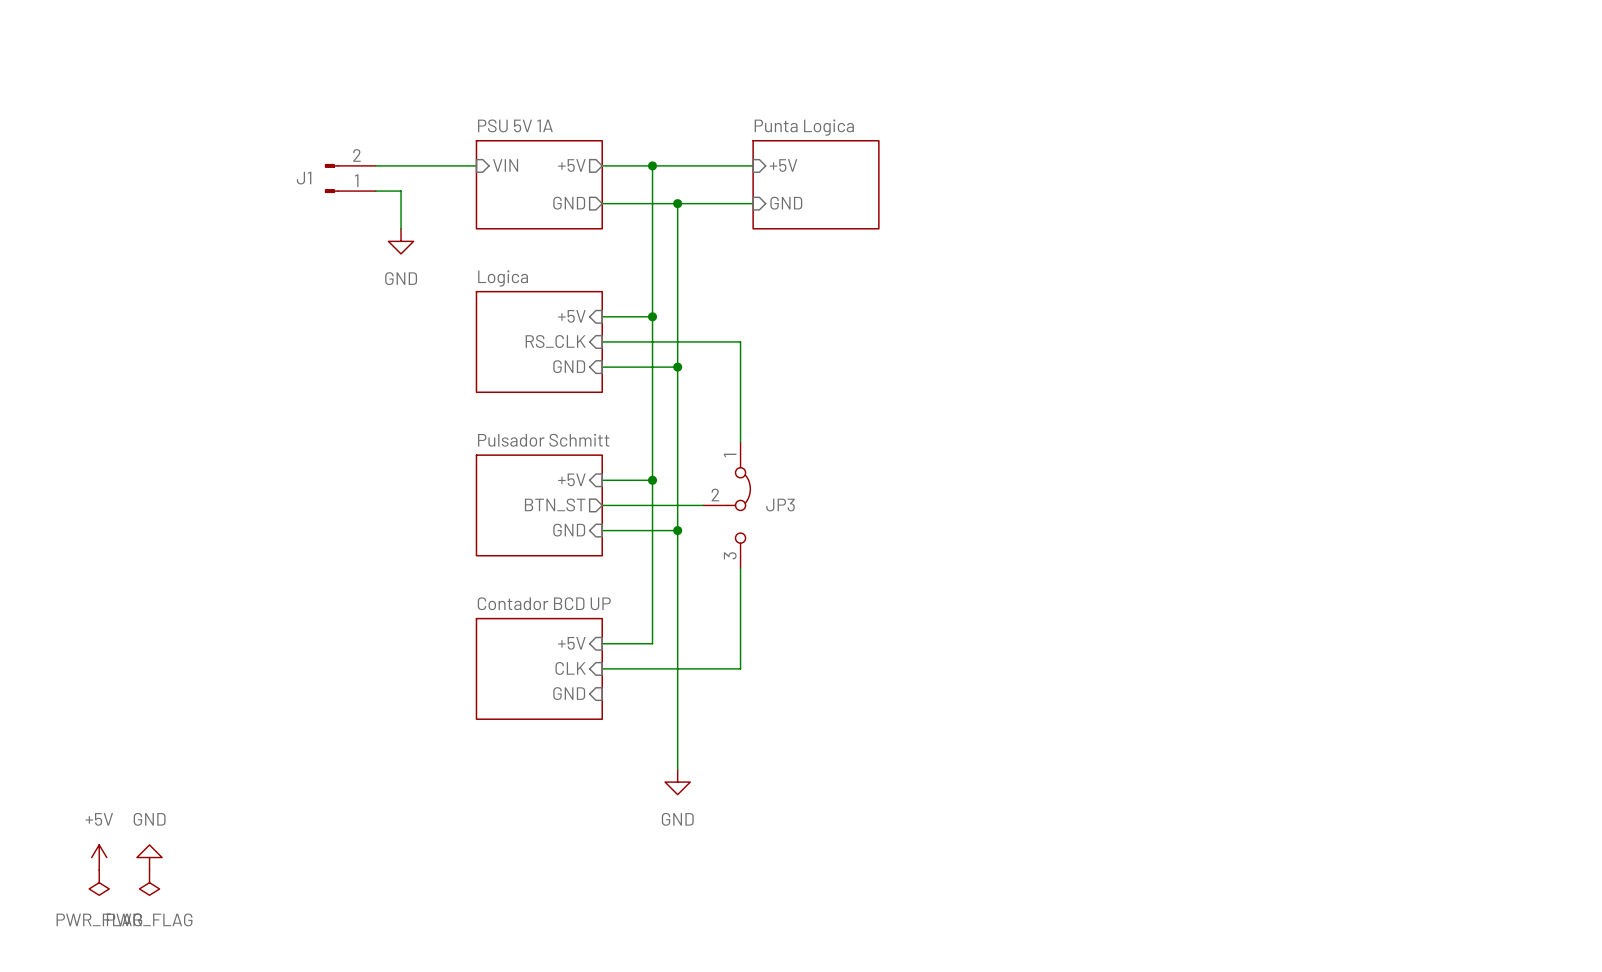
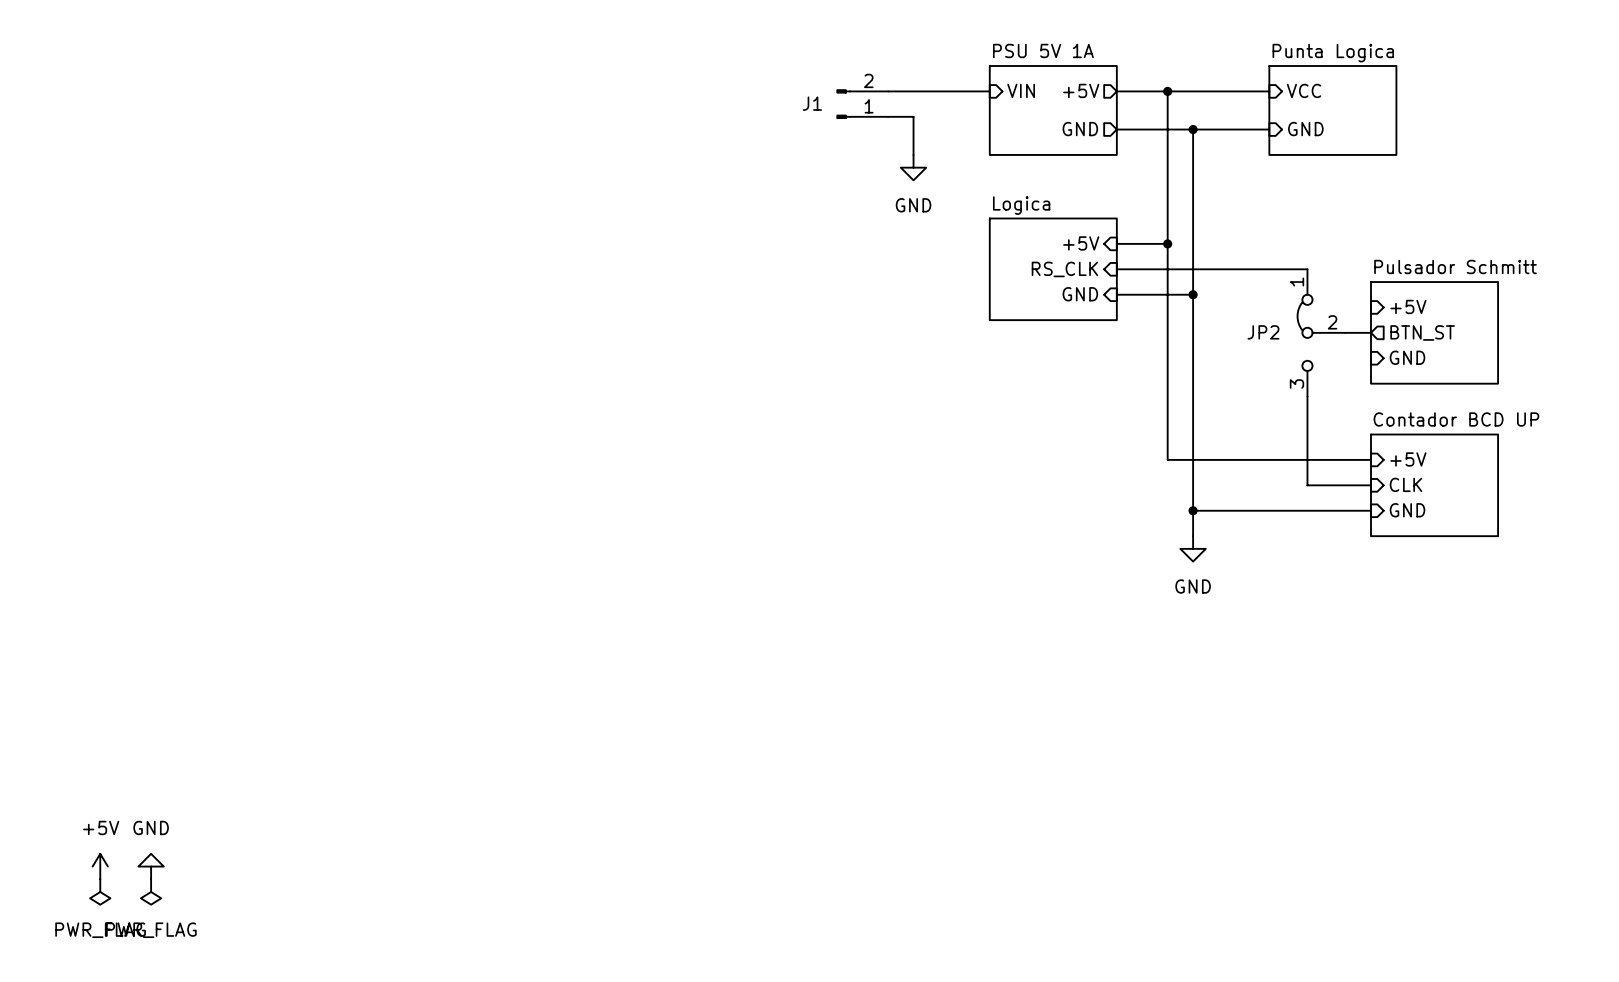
sheet pin: none -> VIN (1021, 90)
wire: none -> (888, 91) (989, 91)
sheet pin: none -> +5V (1081, 90)
wire: none -> (1116, 91) (1269, 91)
wire: none -> (1167, 91) (1167, 459) (1371, 459)
junction: none -> (1167, 91)
sheet pin: none -> VCC (1304, 90)
sheet Punta Logica: none -> (1332, 110)
wire: none -> (888, 116) (913, 116) (913, 154)
sheet pin: none -> GND (1080, 129)
sheet pin: none -> GND (1305, 129)
wire: none -> (1116, 129) (1269, 129)
wire: none -> (1193, 129) (1193, 536)
junction: none -> (1193, 129)
wire: (375, 165) (476, 165) -> none
sheet pin: VIN (505, 165) -> none
sheet pin: +5V (571, 165) -> none
wire: (602, 165) (753, 165) -> none
wire: (652, 165) (652, 643) (602, 643) -> none
junction: (652, 165) -> none
sheet pin: +5V (783, 165) -> none
power symbol: none -> GND (913, 167)
J1 position: (350, 178) -> (862, 104)
sheet PSU 5V 1A position: (539, 184) -> (1053, 110)
sheet Punta Logica: (815, 184) -> none
wire: (375, 191) (401, 191) (401, 228) -> none
sheet pin: GND (569, 203) -> none
wire: (602, 203) (753, 203) -> none
wire: (677, 203) (677, 769) -> none
junction: (677, 203) -> none
sheet pin: GND (786, 203) -> none
sheet pin: none -> +5V (1081, 243)
power symbol: GND (401, 241) -> none
wire: none -> (1116, 243) (1167, 243)
junction: none -> (1167, 243)
sheet Logica: none -> (1053, 269)
sheet pin: none -> RS_CLK (1064, 269)
wire: none -> (1116, 269) (1307, 269)
sheet pin: none -> GND (1080, 294)
wire: none -> (1116, 294) (1193, 294)
junction: none -> (1193, 294)
sheet pin: none -> +5V (1408, 306)
sheet pin: +5V (571, 316) -> none
wire: (602, 316) (652, 316) -> none
junction: (652, 316) -> none
sheet pin: none -> BTN_ST (1422, 332)
JP2: none -> (1321, 332)
wire: none -> (1345, 332) (1371, 332)
sheet Pulsador Schmitt: none -> (1434, 332)
sheet Logica: (539, 341) -> none
sheet pin: RS_CLK (555, 341) -> none
wire: (602, 341) (740, 341) (740, 442) -> none
sheet pin: none -> GND (1407, 357)
sheet pin: GND (569, 366) -> none
wire: (602, 367) (677, 367) -> none
junction: (677, 367) -> none
wire: none -> (1307, 396) (1307, 485) (1371, 485)
sheet pin: none -> +5V (1408, 459)
sheet pin: +5V (571, 479) -> none
sheet pin: none -> CLK (1405, 484)
wire: (602, 480) (652, 480) -> none
junction: (652, 480) -> none
sheet Contador BCD UP: none -> (1434, 485)
sheet pin: BTN_ST (555, 504) -> none
sheet pin: none -> GND (1407, 510)
sheet Pulsador Schmitt: (539, 505) -> none
wire: (602, 505) (702, 505) -> none
JP3: (726, 505) -> none
wire: none -> (1193, 510) (1371, 510)
junction: none -> (1193, 510)
sheet pin: GND (569, 530) -> none
wire: (602, 530) (677, 530) -> none
junction: (677, 530) -> none
power symbol: none -> GND (1193, 548)
wire: (740, 568) (740, 668) (602, 668) -> none
sheet pin: +5V (571, 643) -> none
sheet Contador BCD UP: (539, 668) -> none
sheet pin: CLK (570, 668) -> none
sheet pin: GND (569, 693) -> none
power symbol: GND (677, 782) -> none

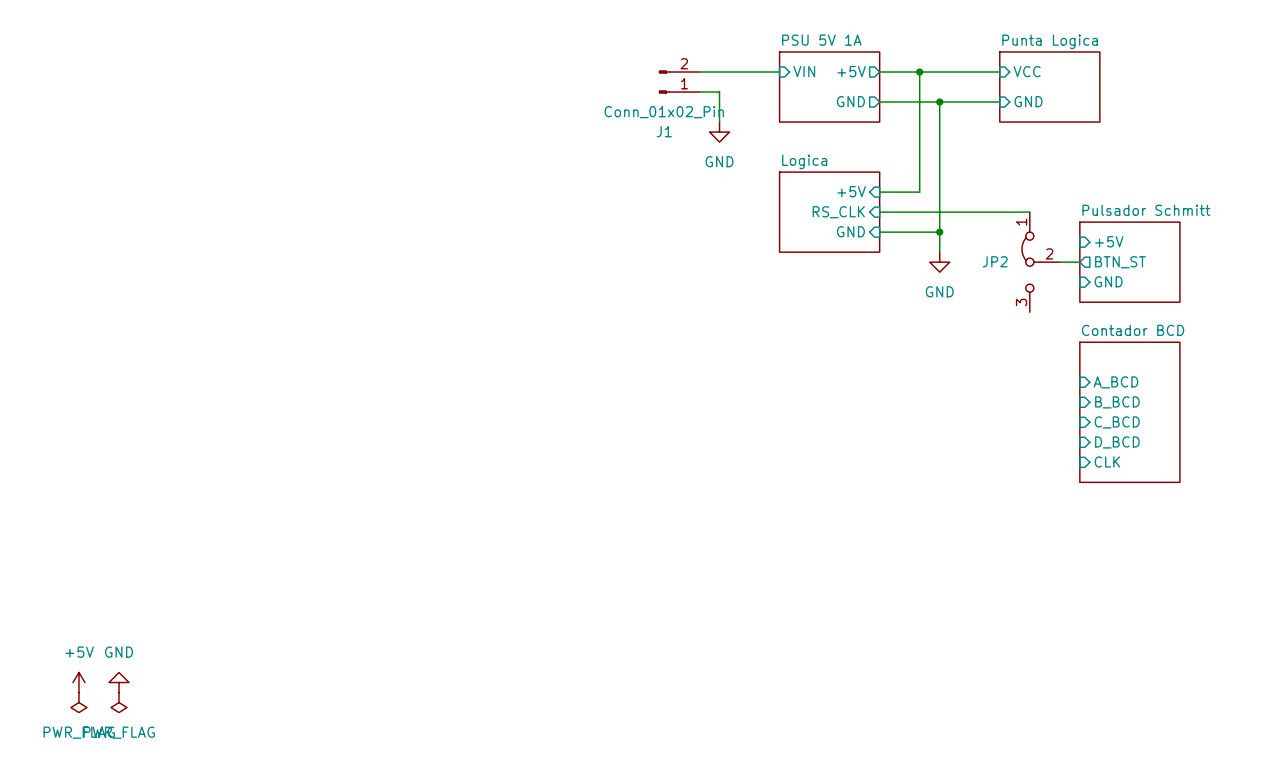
J1 name position: J1 (812, 103) -> J1 (664, 131)
J1 value: none -> Conn_01x02_Pin (664, 112)
wire: (1167, 243) (1167, 459) (1371, 459) -> none
junction: (1167, 243) -> none
wire: (1193, 320) (1193, 536) -> none
wire: (1307, 396) (1307, 485) (1371, 485) -> none
sheet pin: +5V (1408, 459) -> none
sheet pin: CLK (1405, 484) -> A_BCD (1115, 382)
sheet Contador BCD UP: (1434, 485) -> none
wire: (1193, 510) (1371, 510) -> none
junction: (1193, 510) -> none
sheet pin: GND (1407, 510) -> B_BCD (1117, 402)
sheet Contador BCD: none -> (1129, 412)
sheet pin: none -> C_BCD (1117, 422)
power symbol position: GND (1193, 548) -> GND (939, 262)
sheet pin: none -> D_BCD (1117, 442)
sheet pin: none -> CLK (1107, 461)

